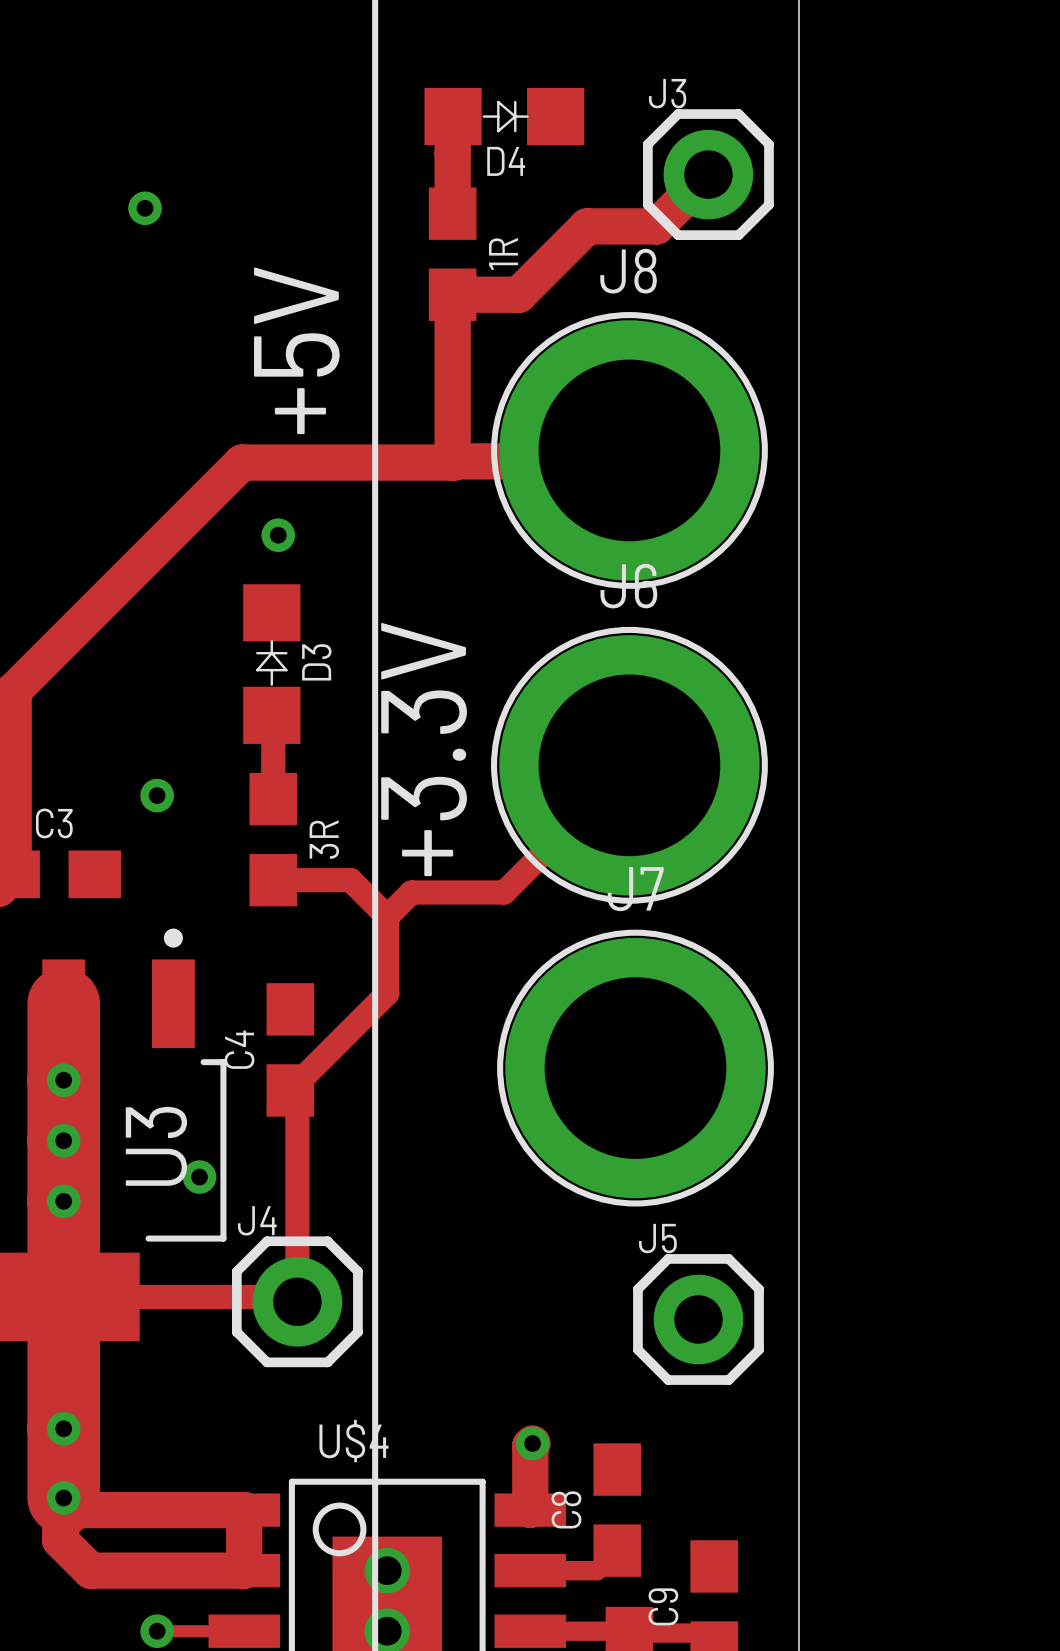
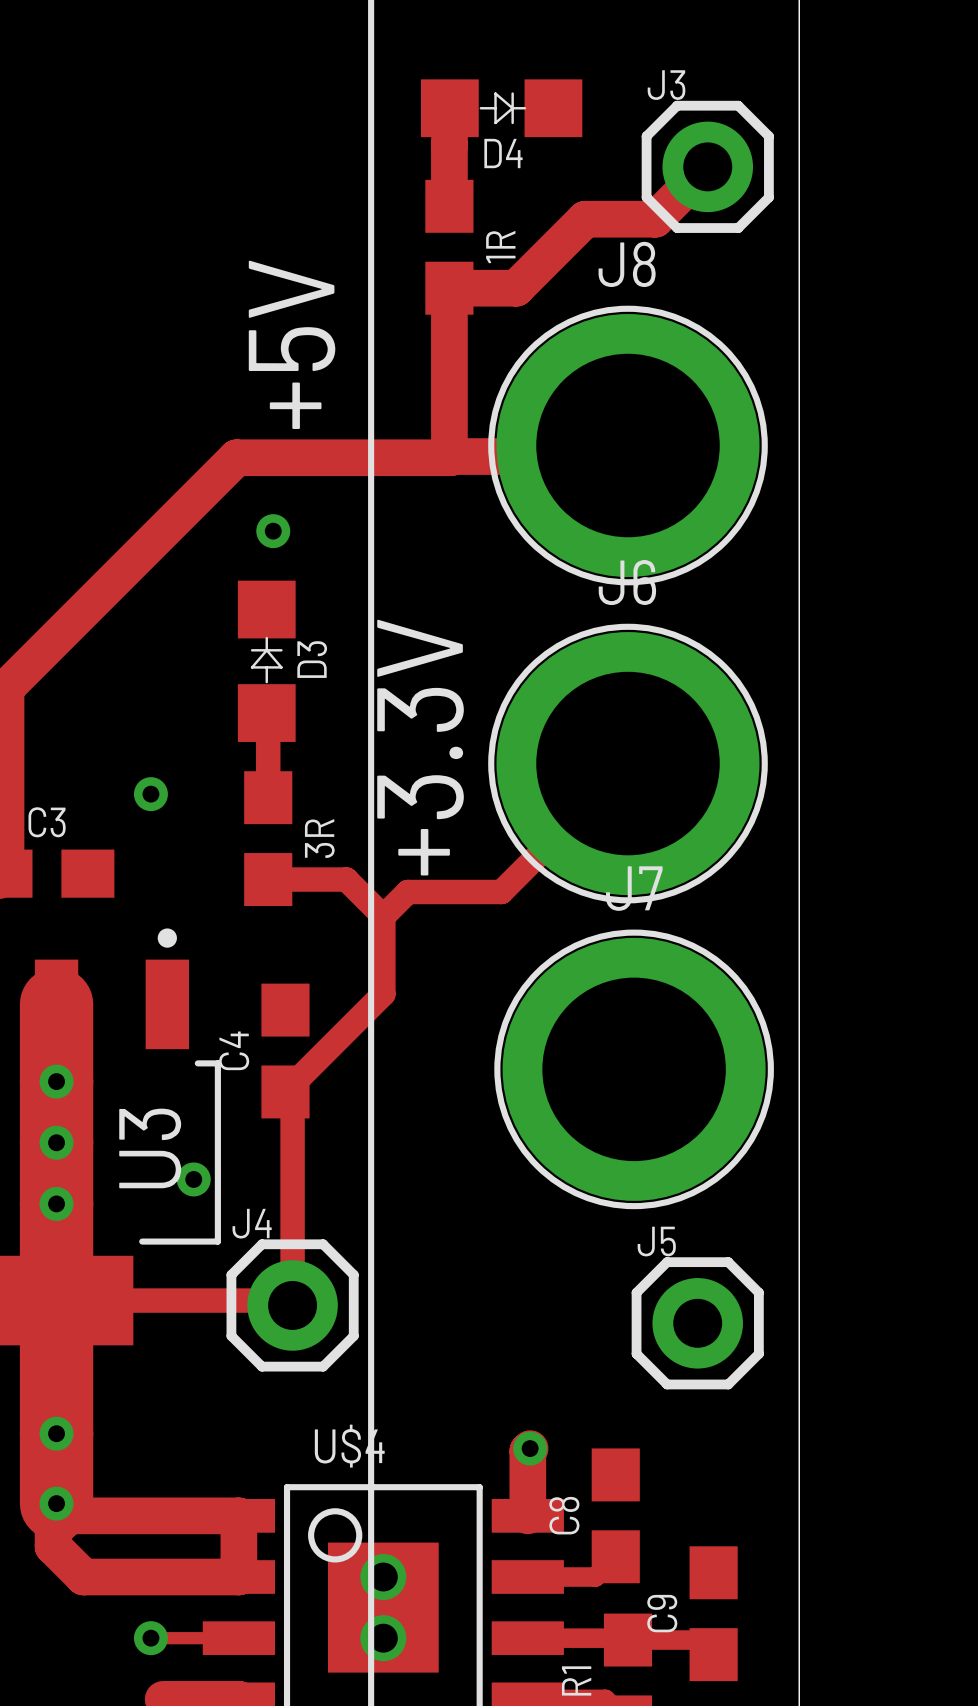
via: (145, 208) -> none

